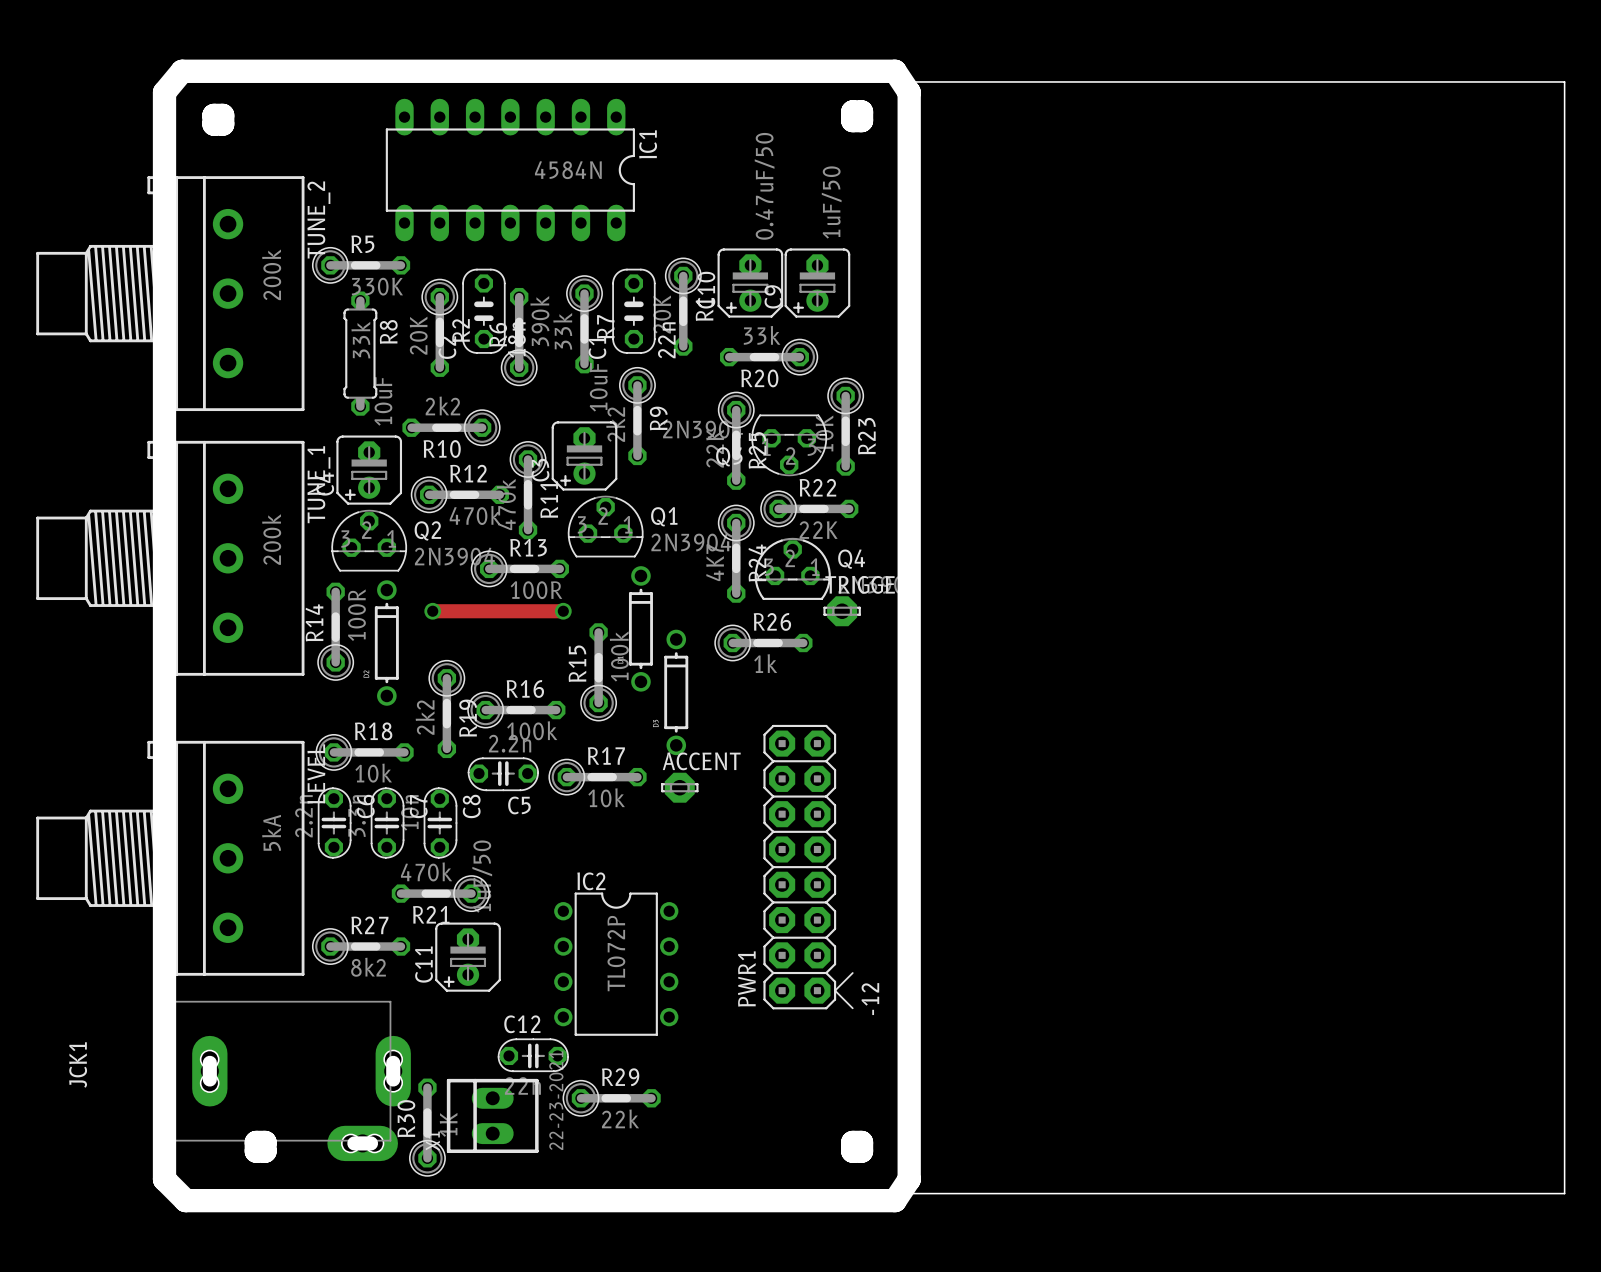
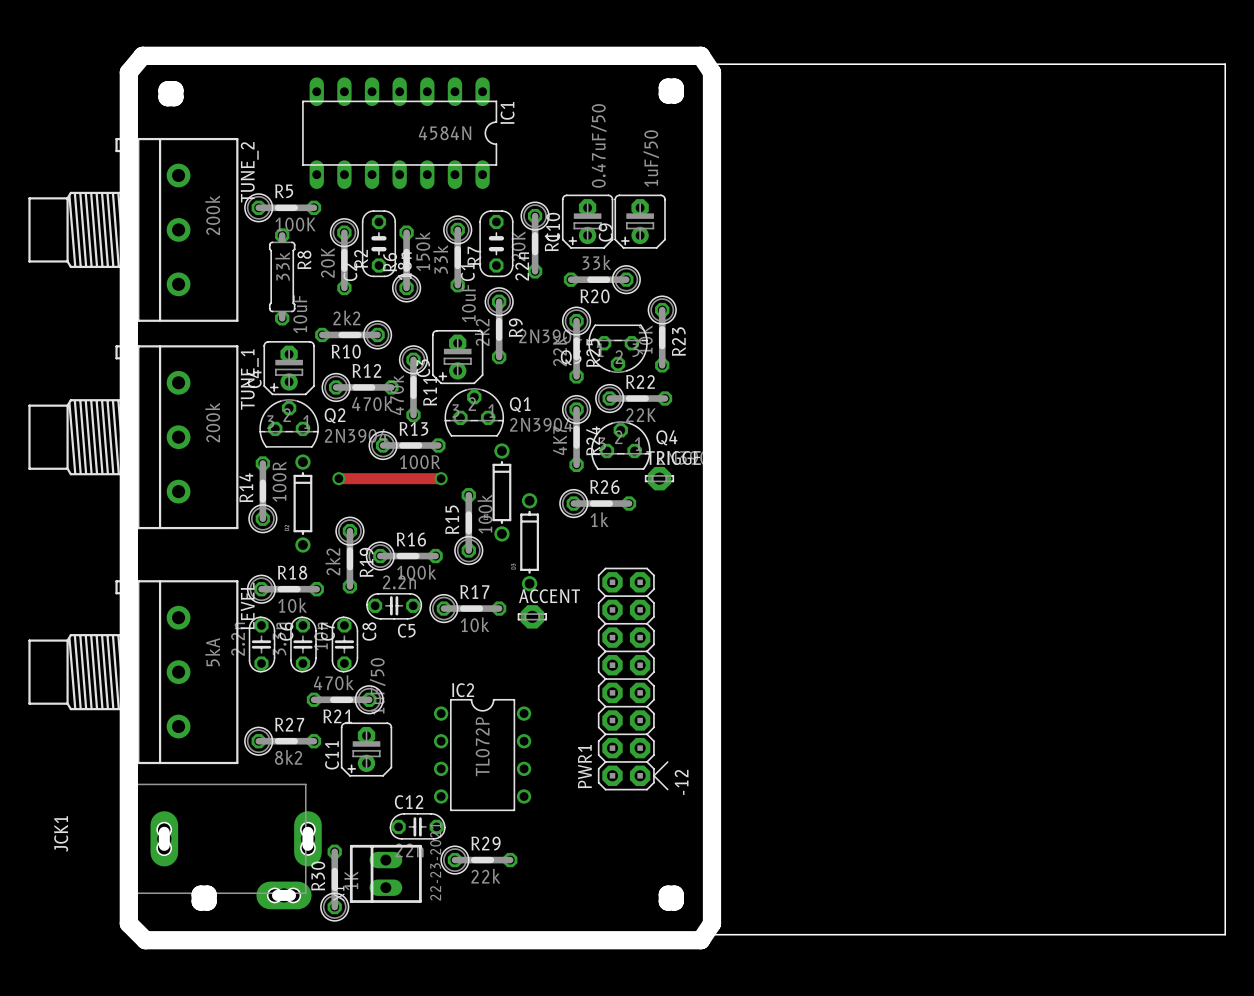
R5 value: 330K (377, 286) -> 100K (295, 224)
R6 value: 390k (539, 321) -> 150k (422, 251)

